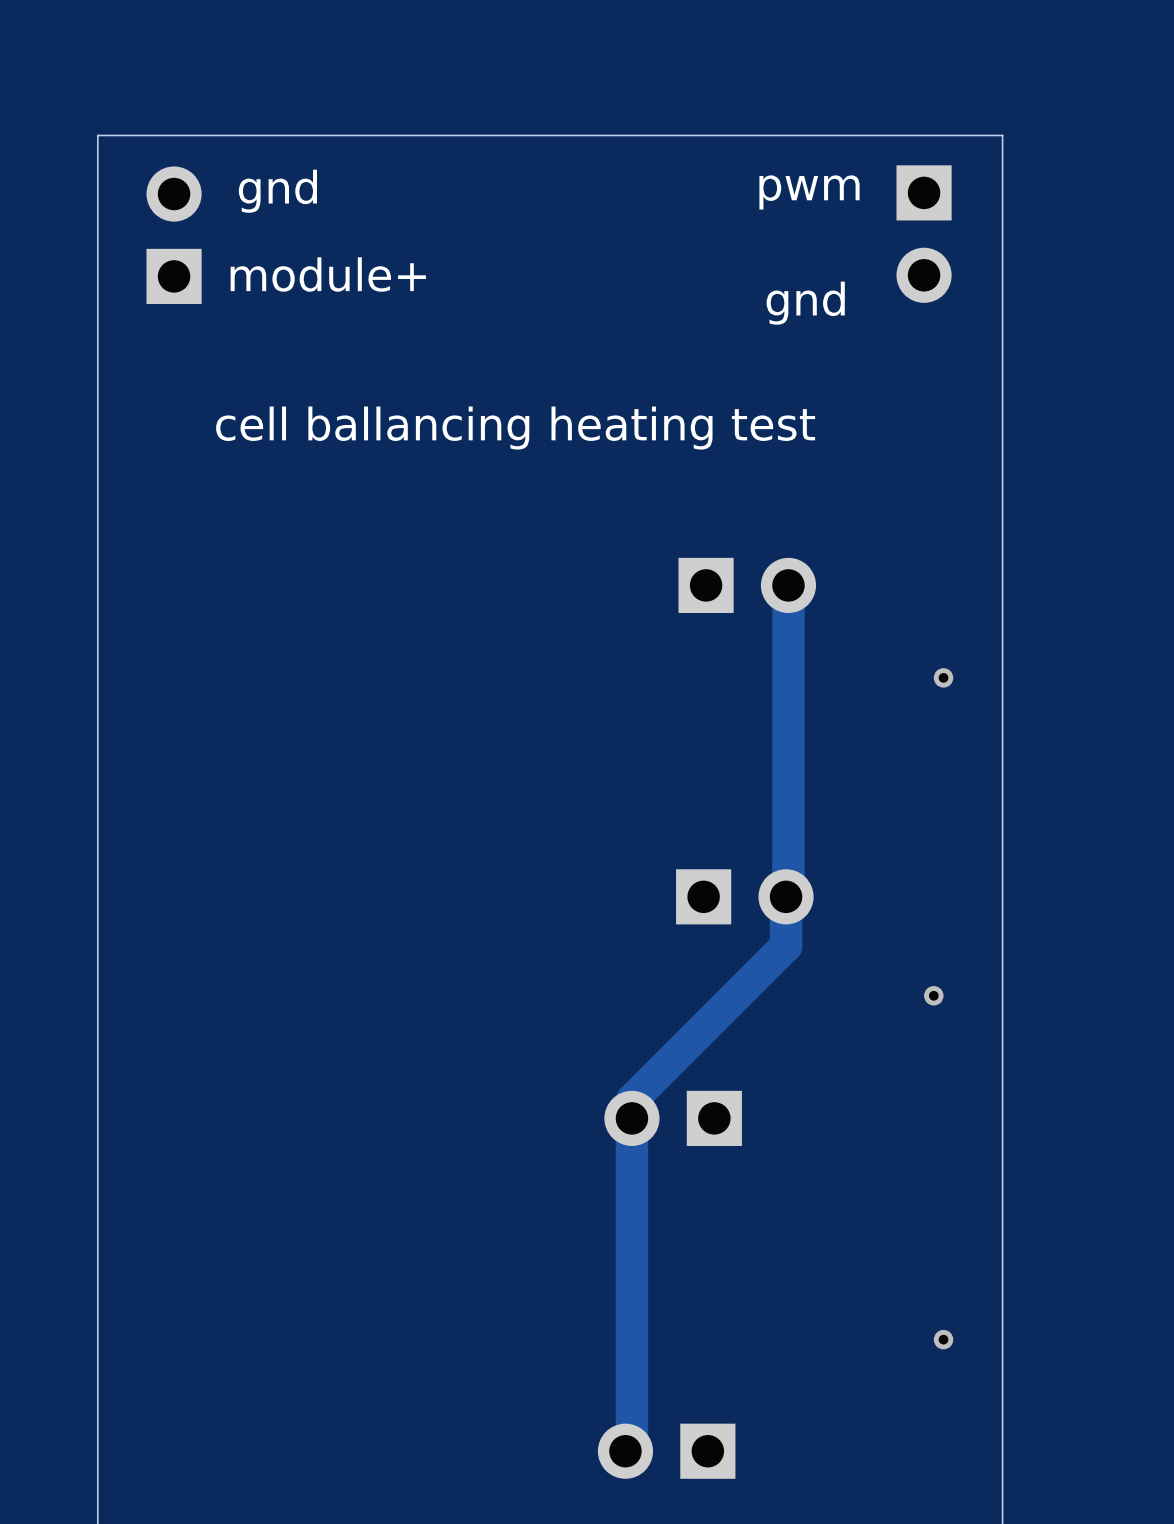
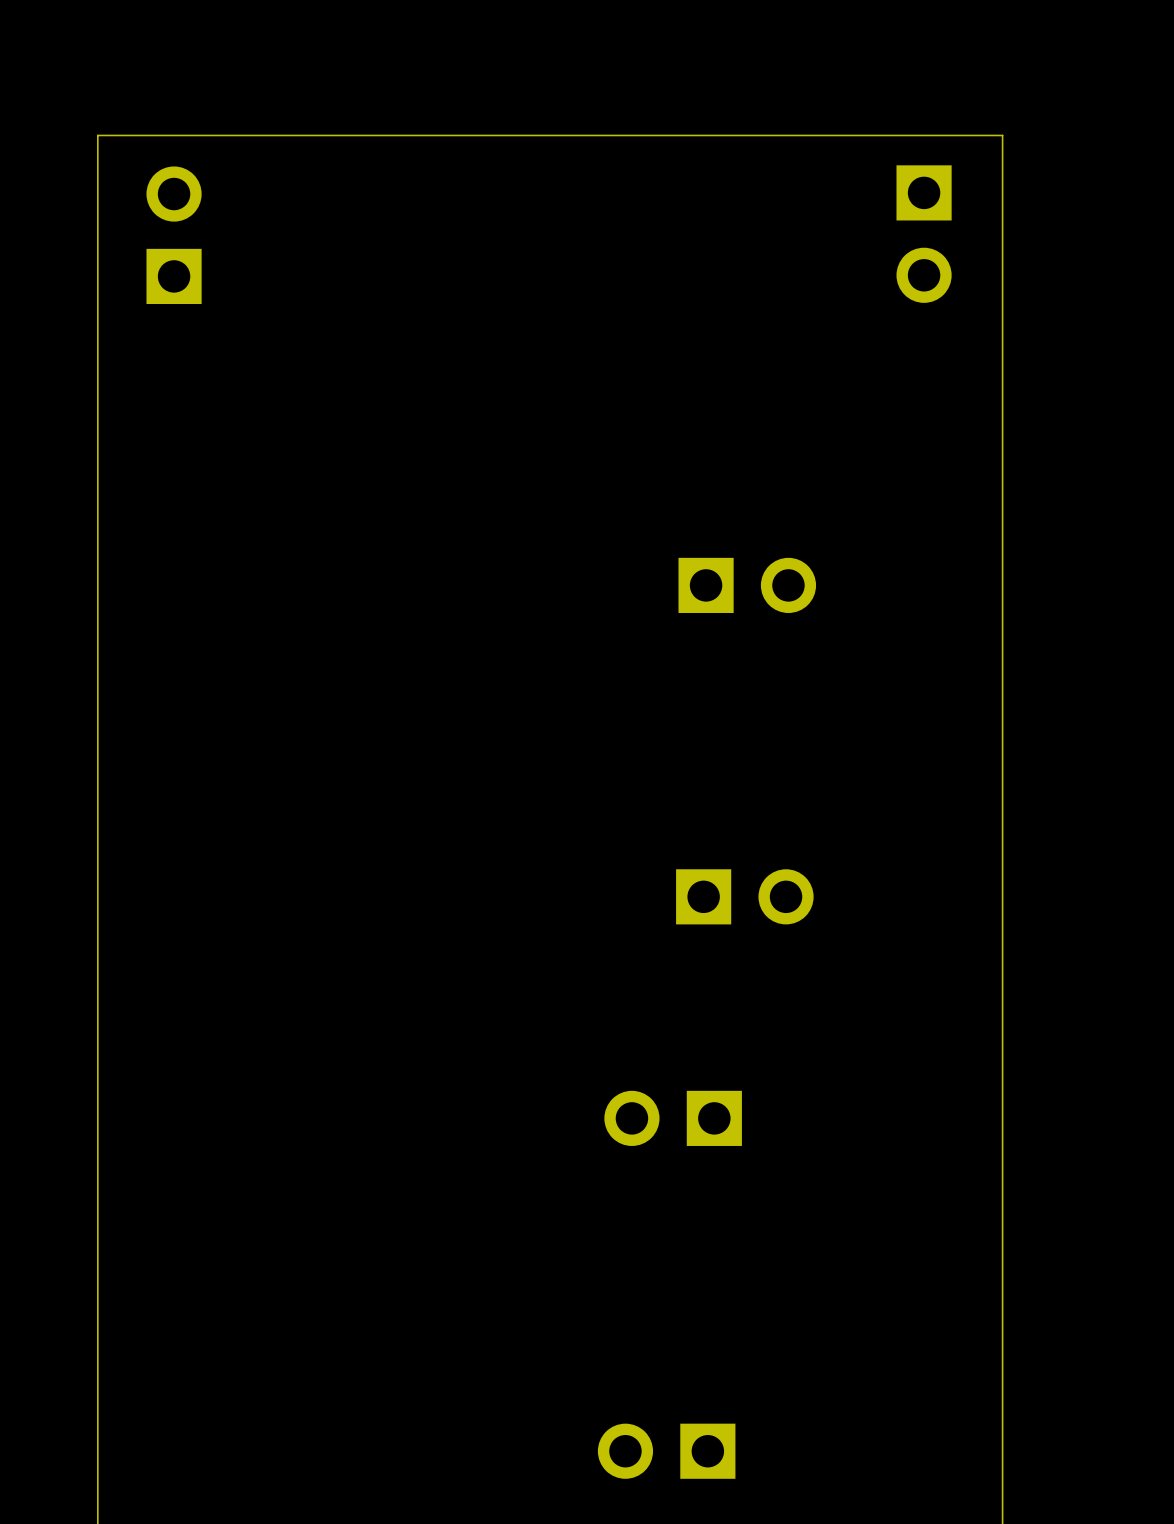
text: gnd (277, 191) -> none
text: pwm (809, 192) -> none
text: module+ (328, 274) -> none
text: gnd (805, 303) -> none
text: cell ballancing heating test (515, 428) -> none
track: (788, 585) (788, 894) (786, 896) (786, 946) (631, 1100) (631, 1444) (625, 1451) -> none
via: (943, 677) -> none
via: (933, 995) -> none
via: (943, 1339) -> none

